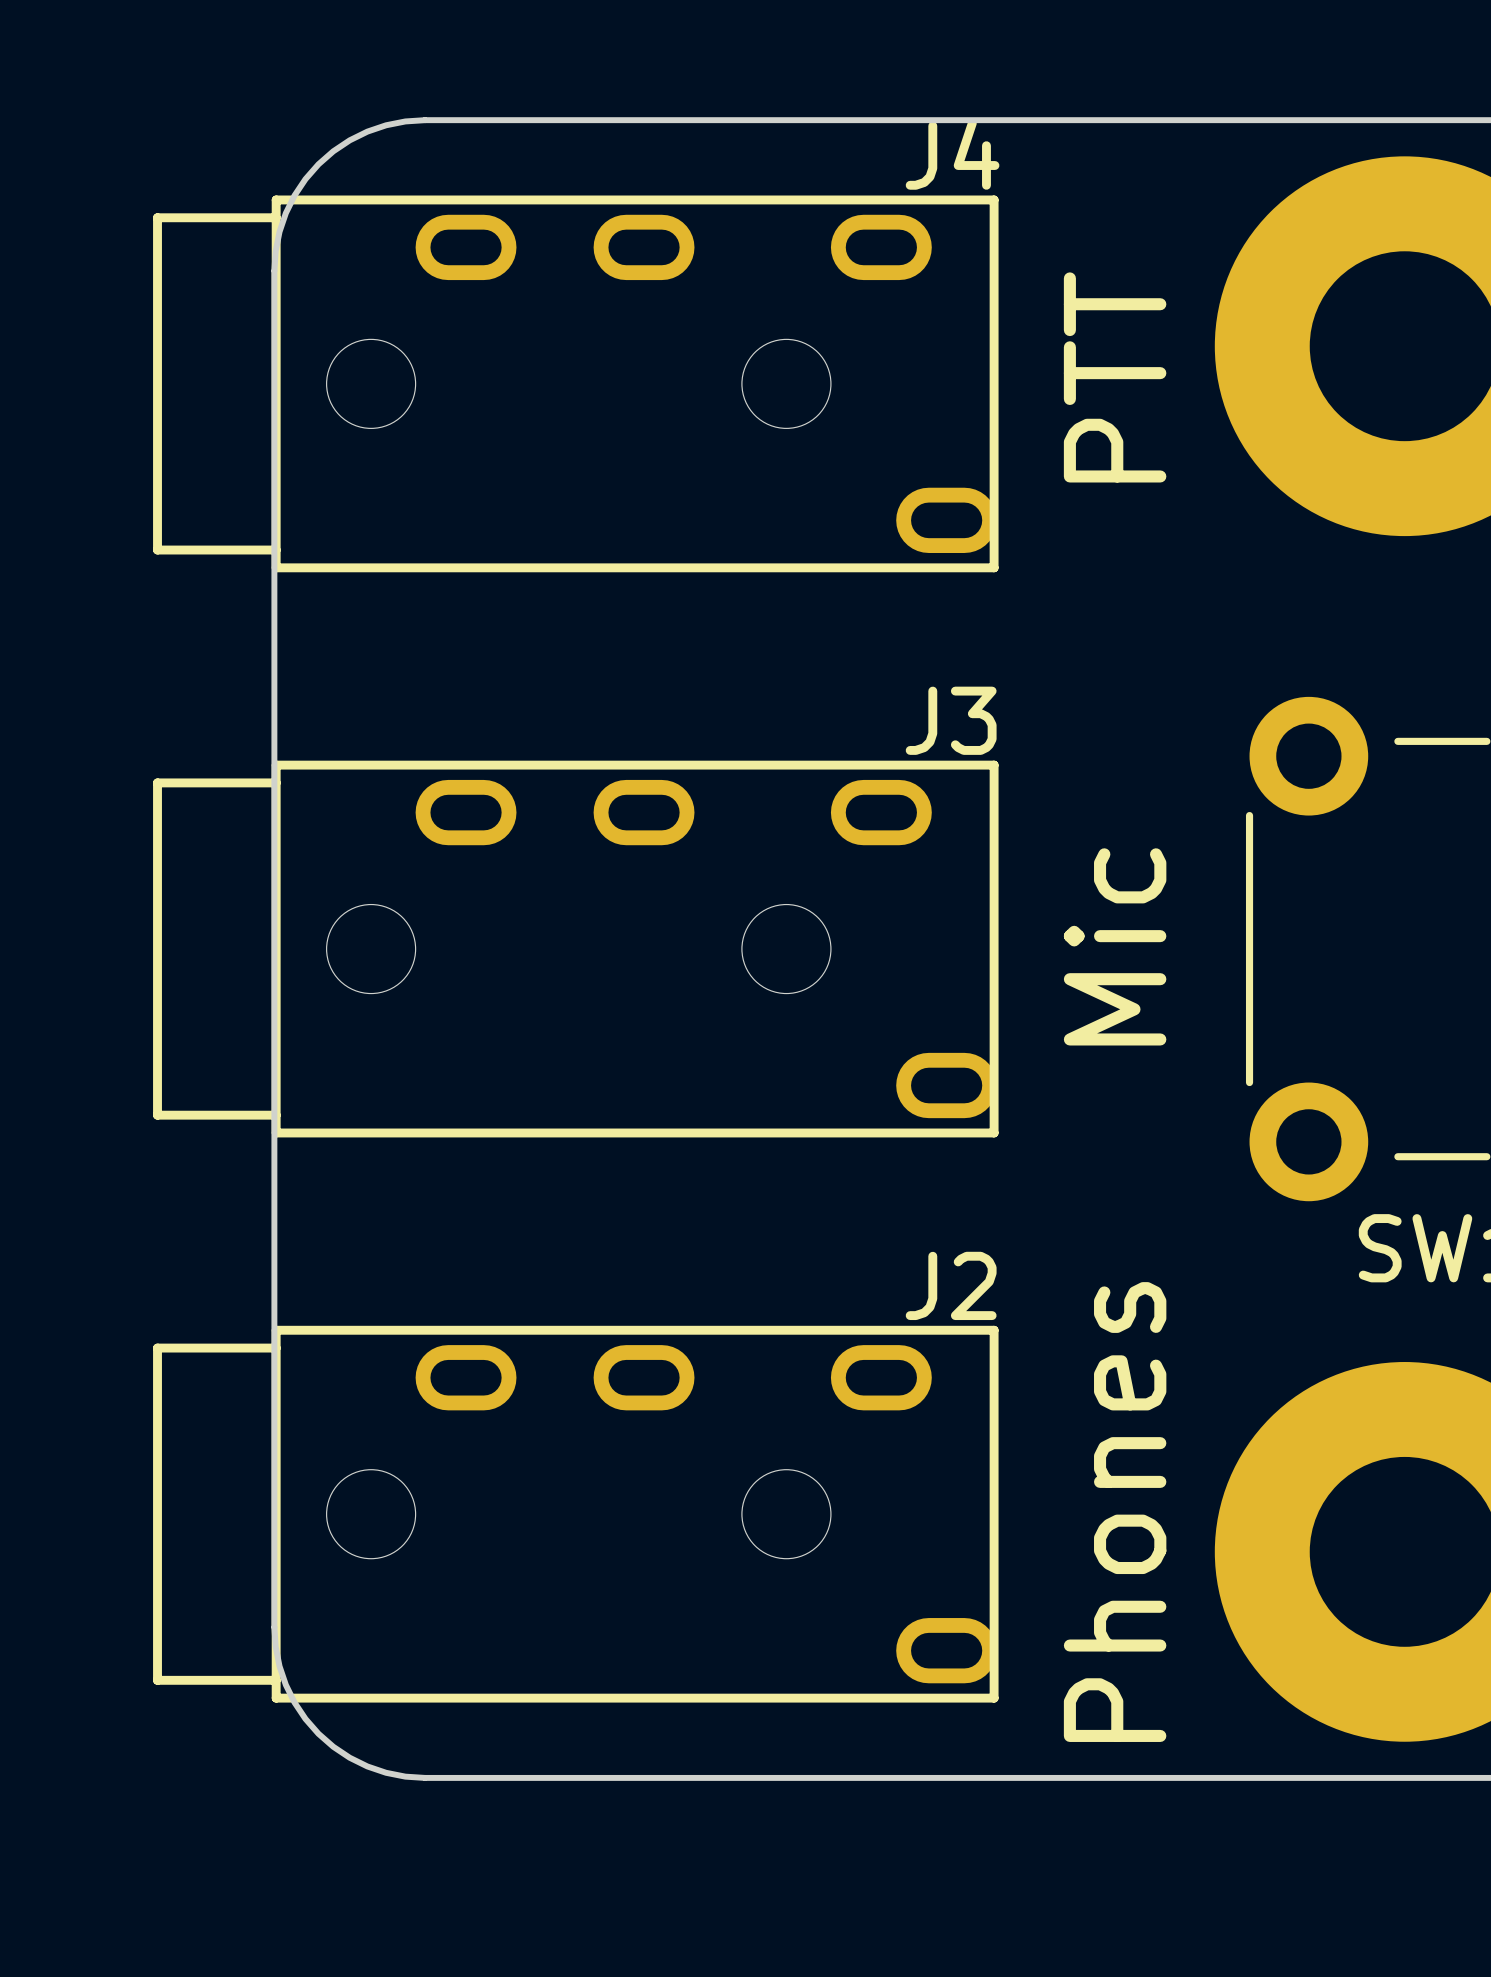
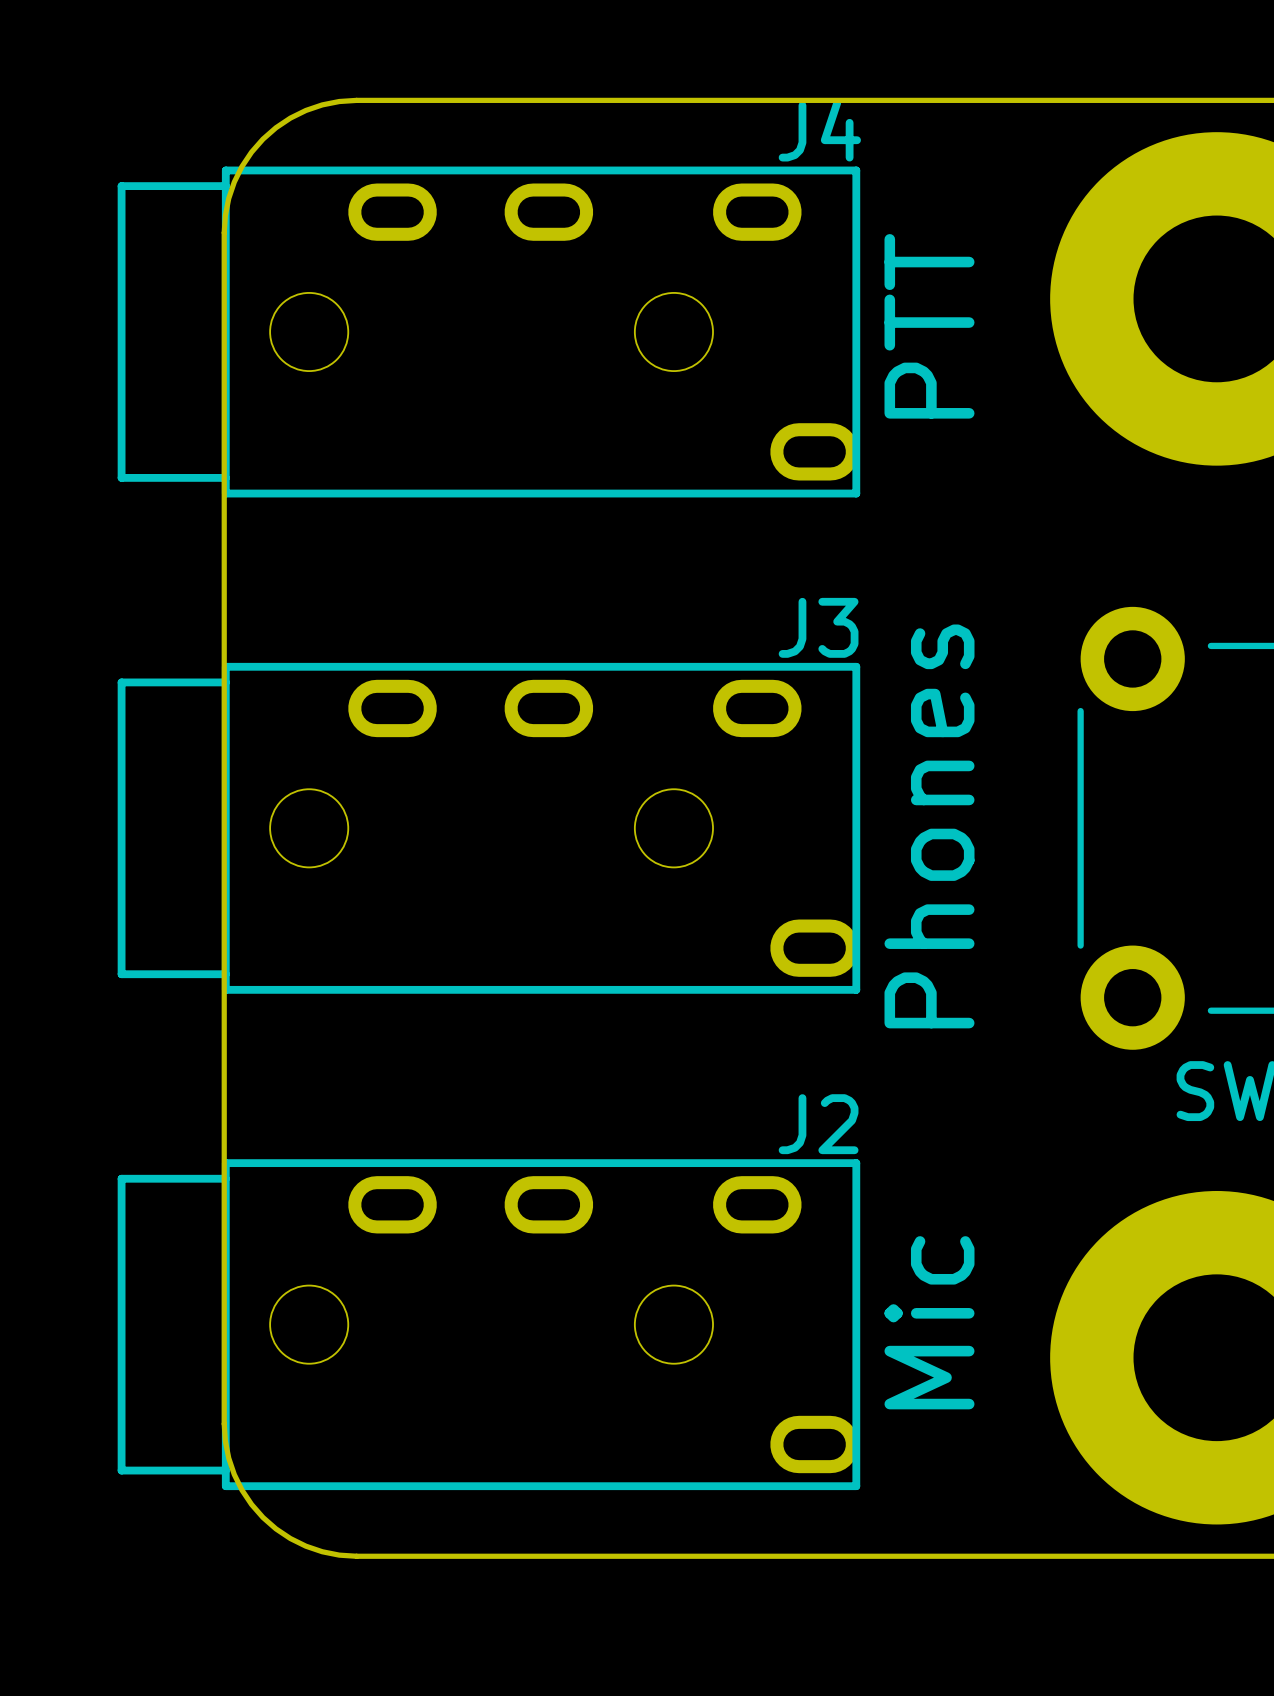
text position: PTT (1115, 377) -> PTT (929, 326)
text position: Mic (1115, 946) -> Mic (929, 1322)
text position: Phones (1115, 1512) -> Phones (929, 826)

